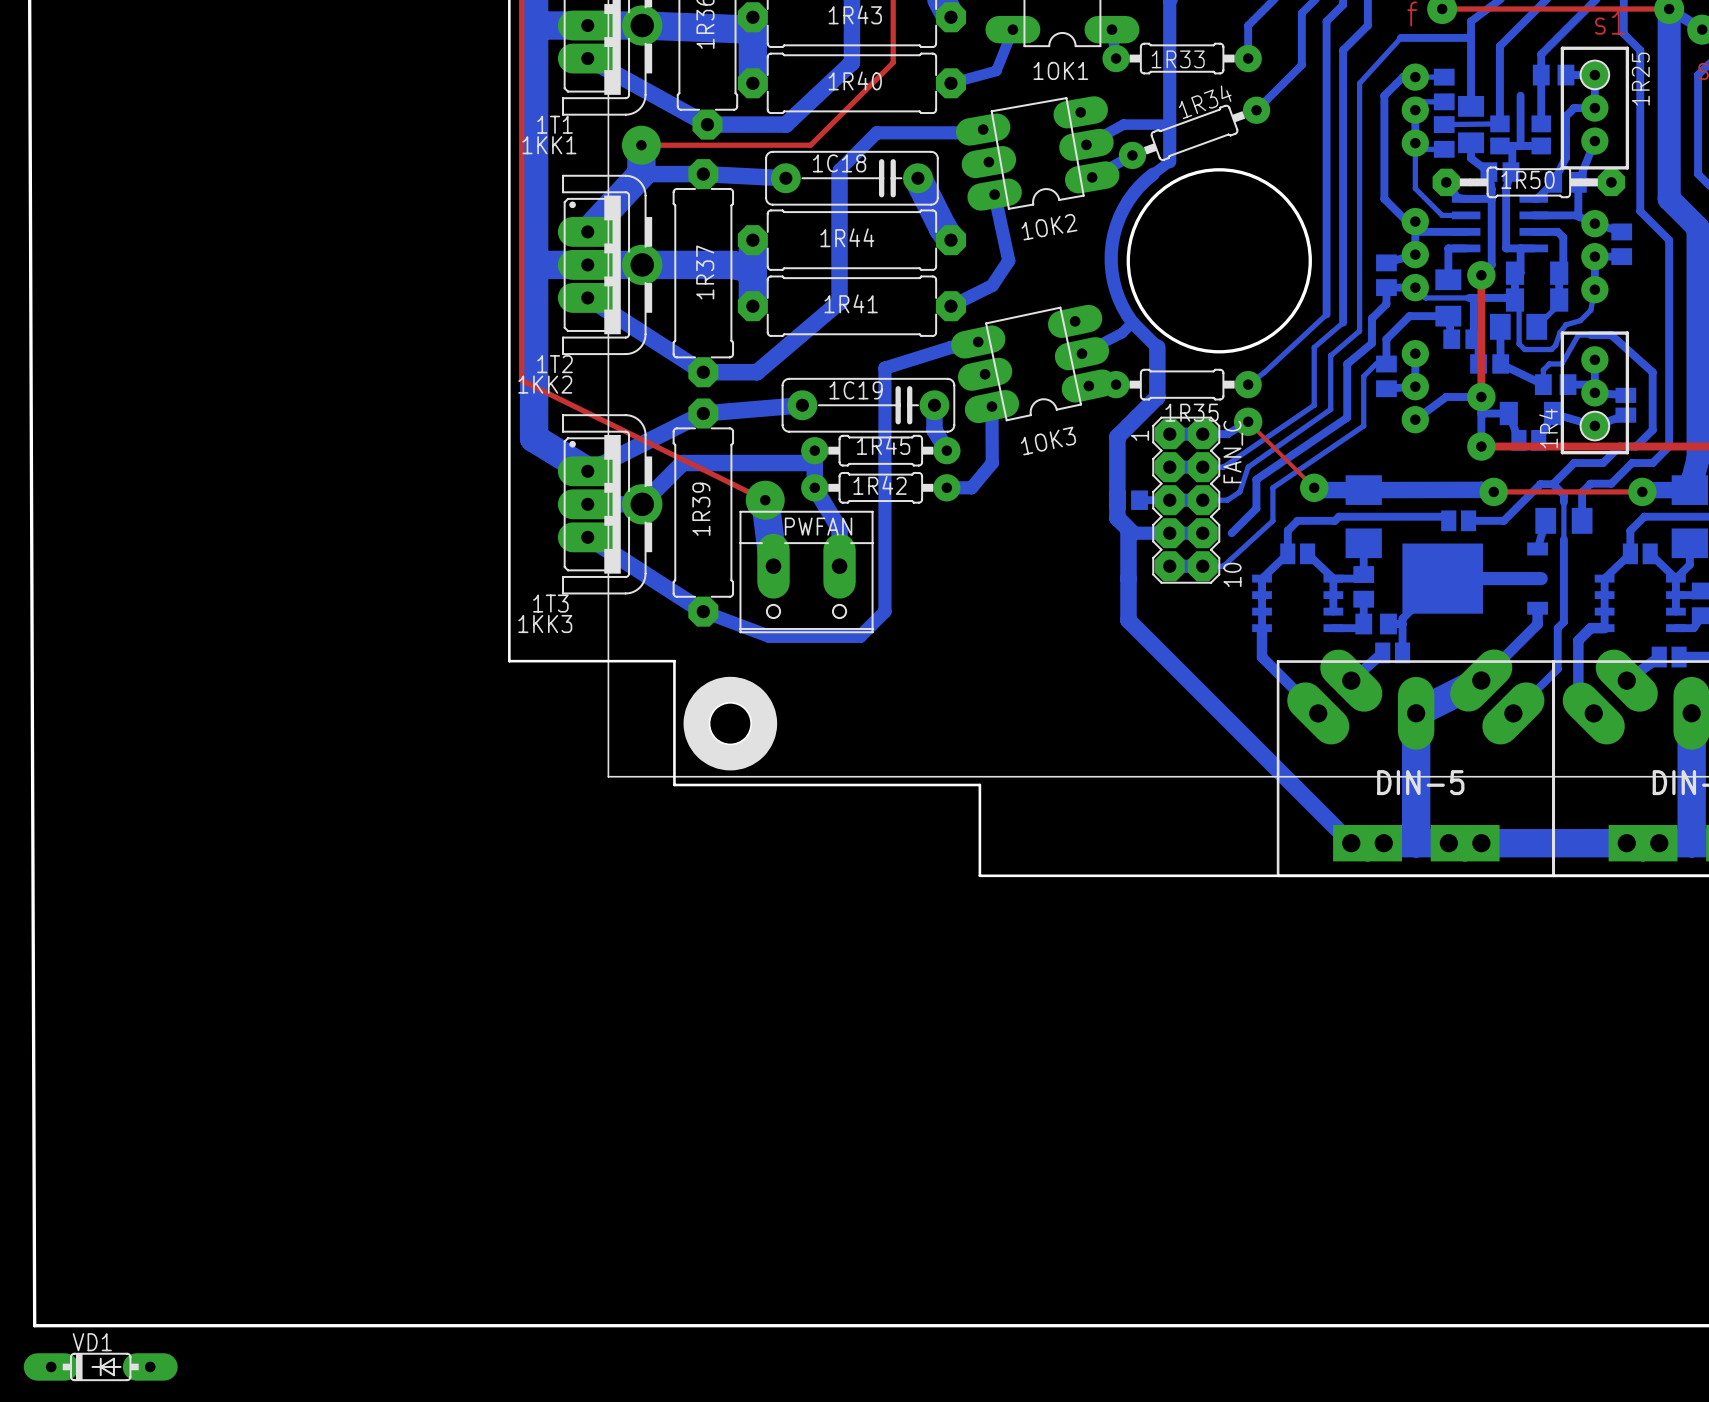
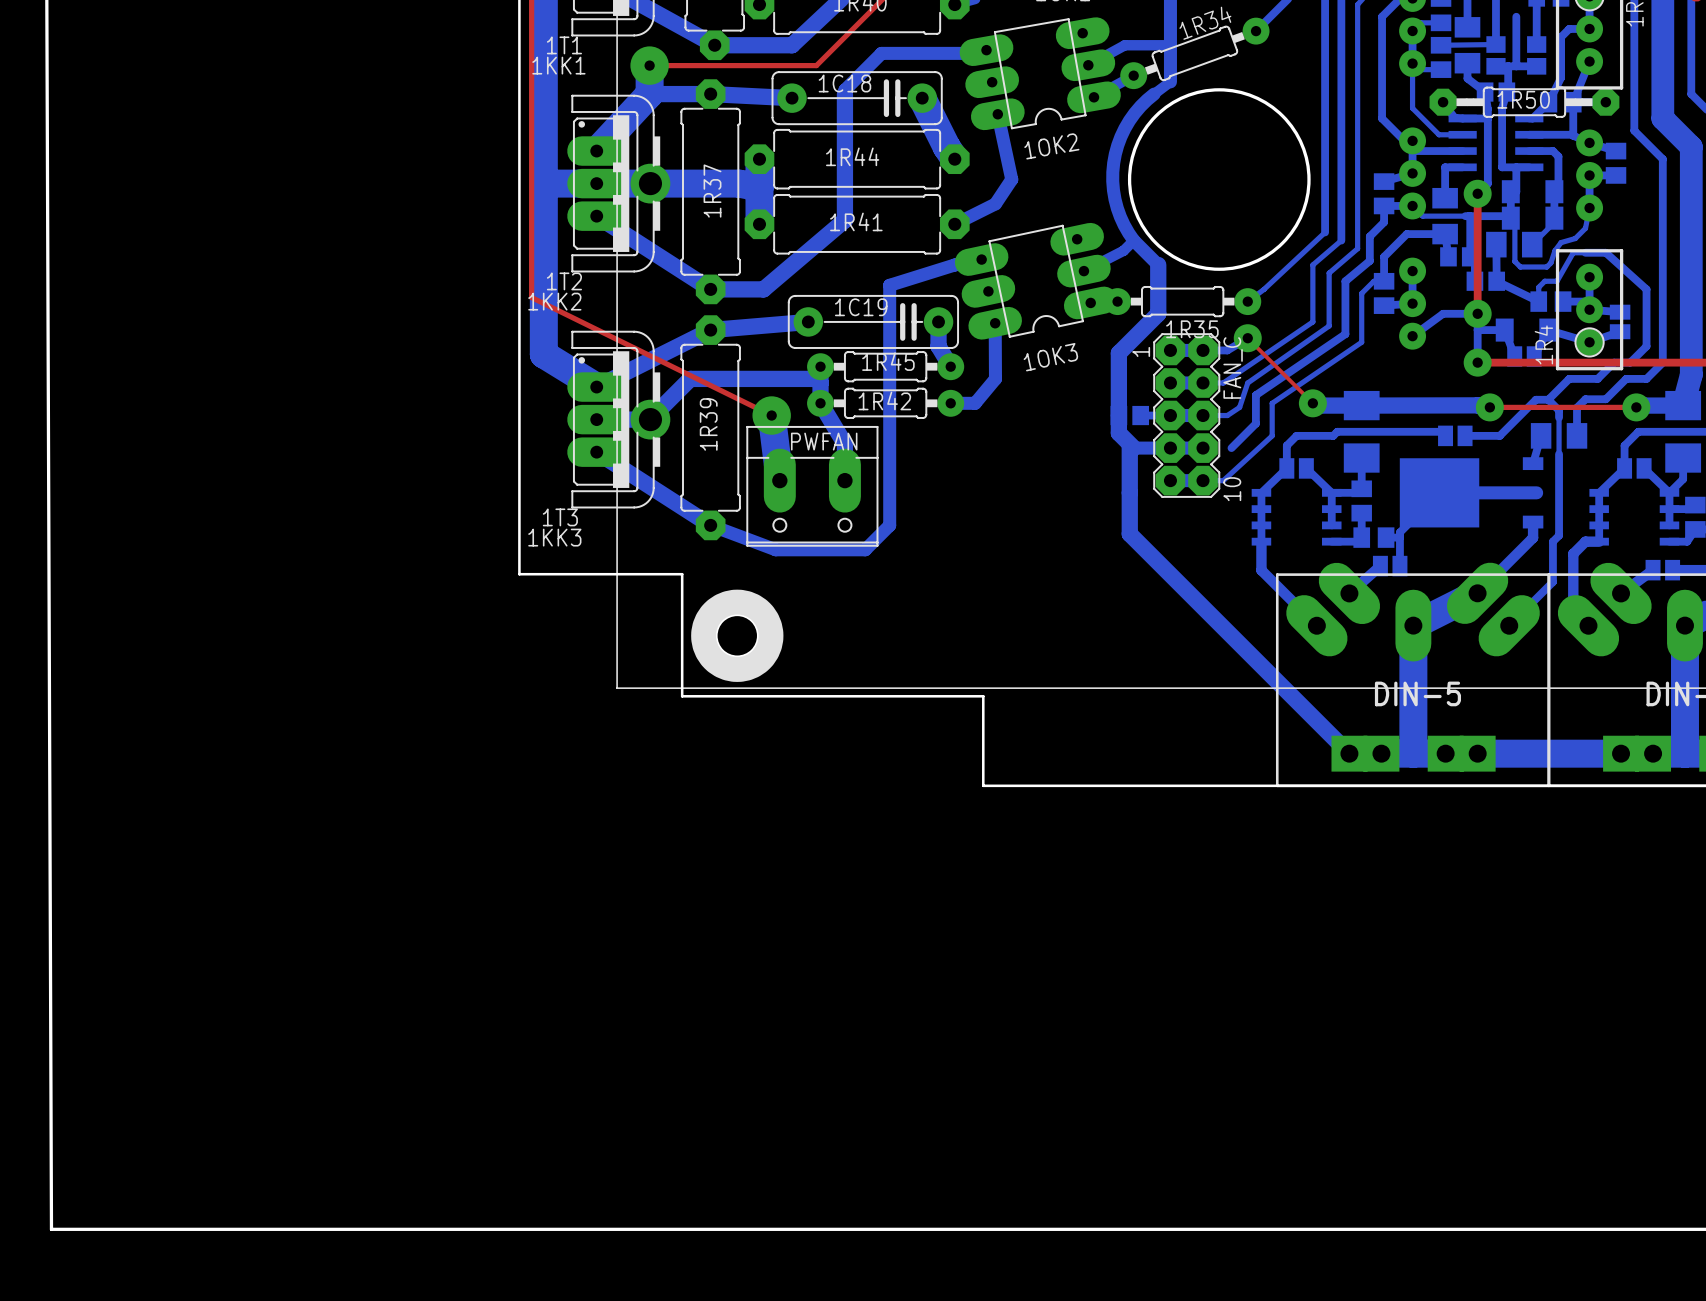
VD1: (100, 1366) -> none

